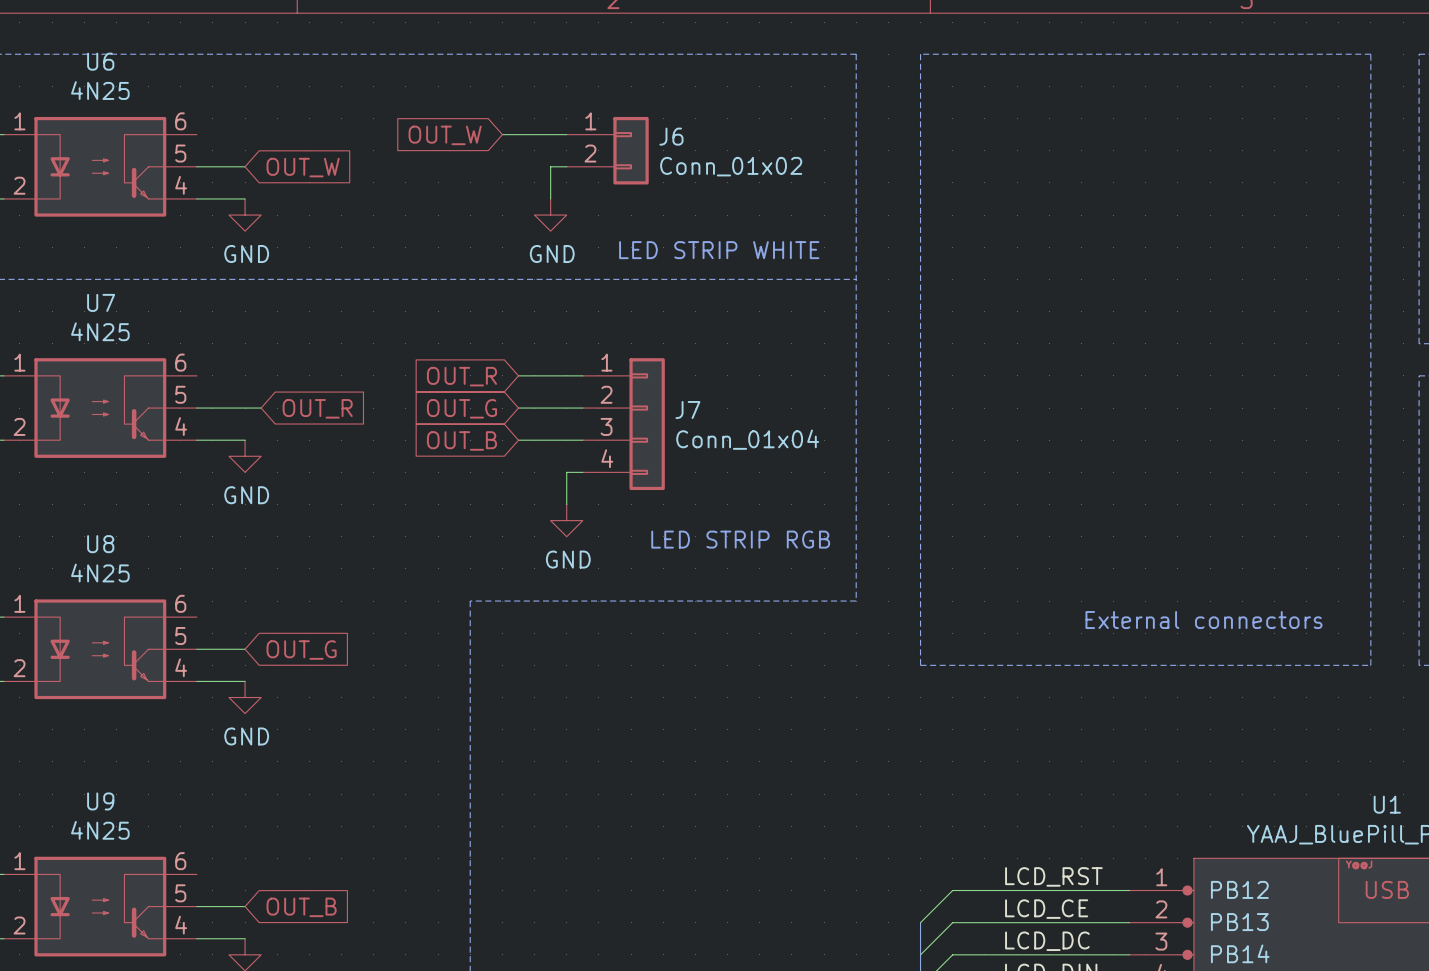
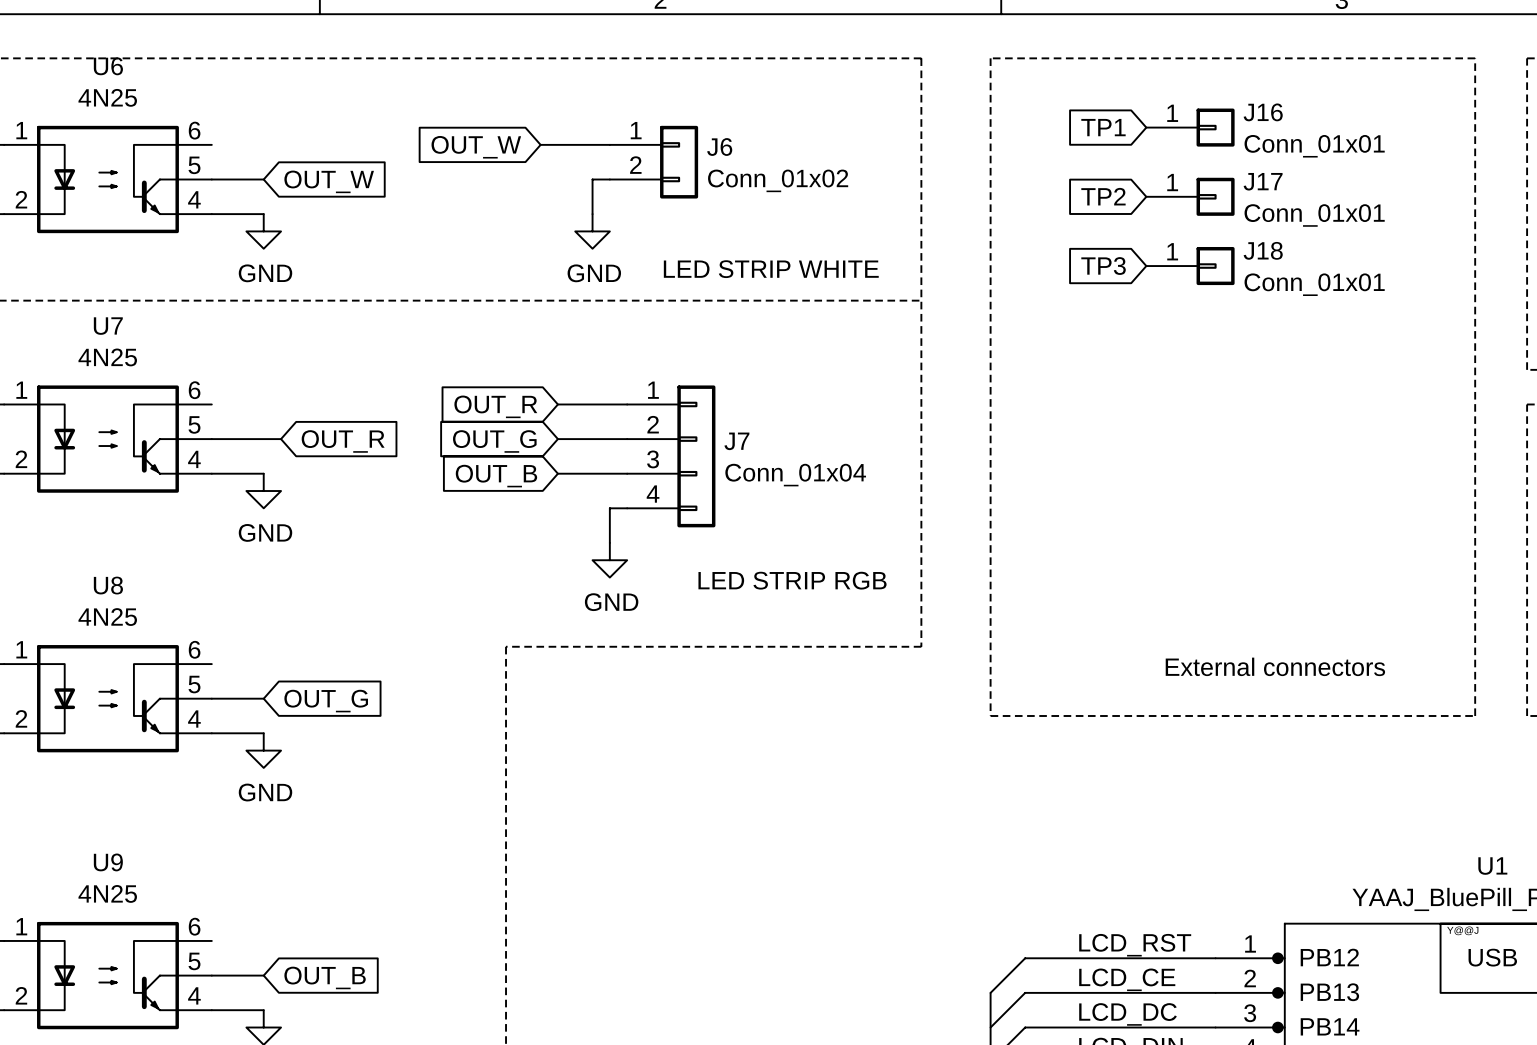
global label: none -> TP1 (1103, 127)
J16: none -> Conn_01x01 (1190, 127)
global label: none -> TP2 (1103, 196)
J17: none -> Conn_01x01 (1190, 196)
global label: none -> TP3 (1103, 266)
J18: none -> Conn_01x01 (1190, 266)

